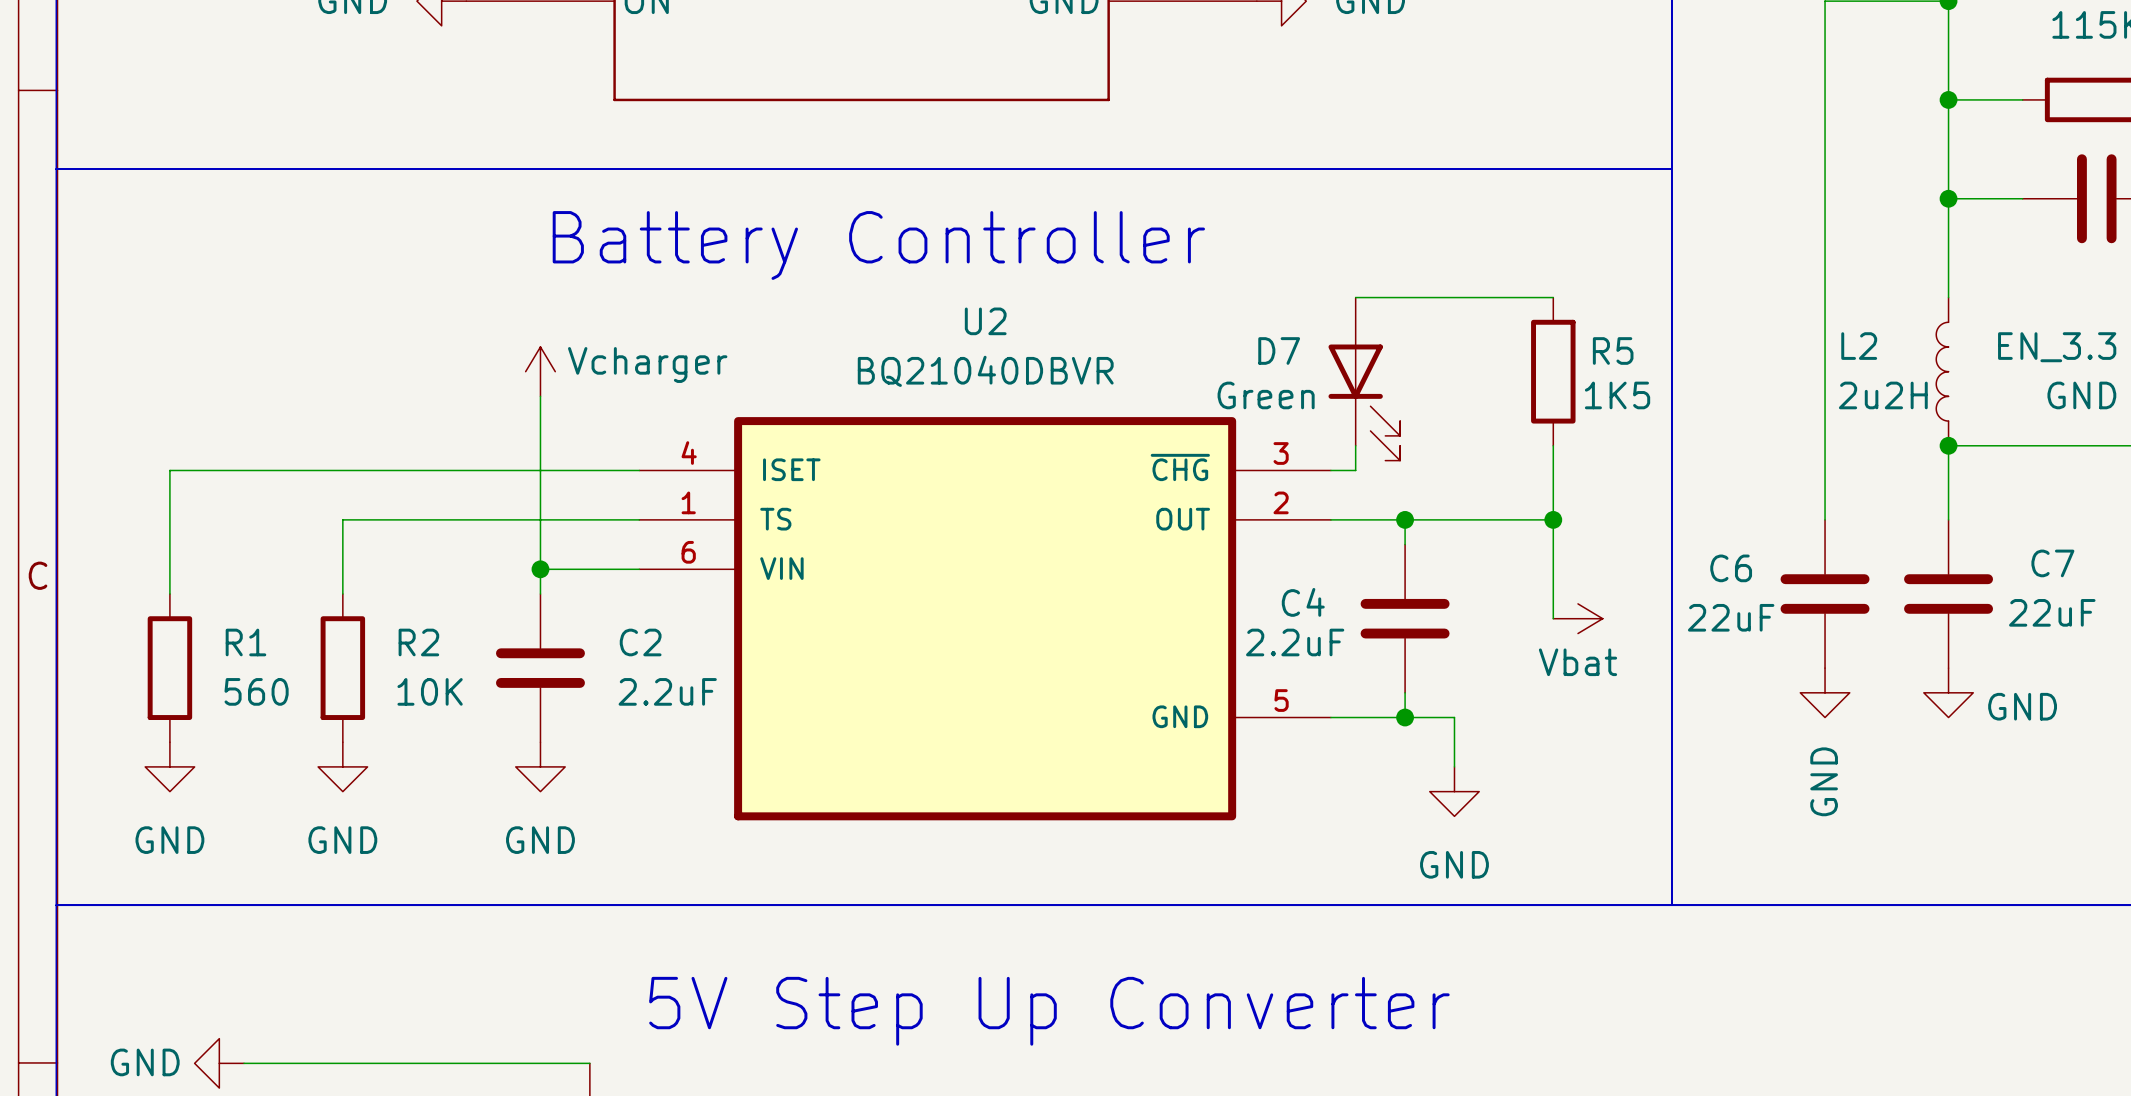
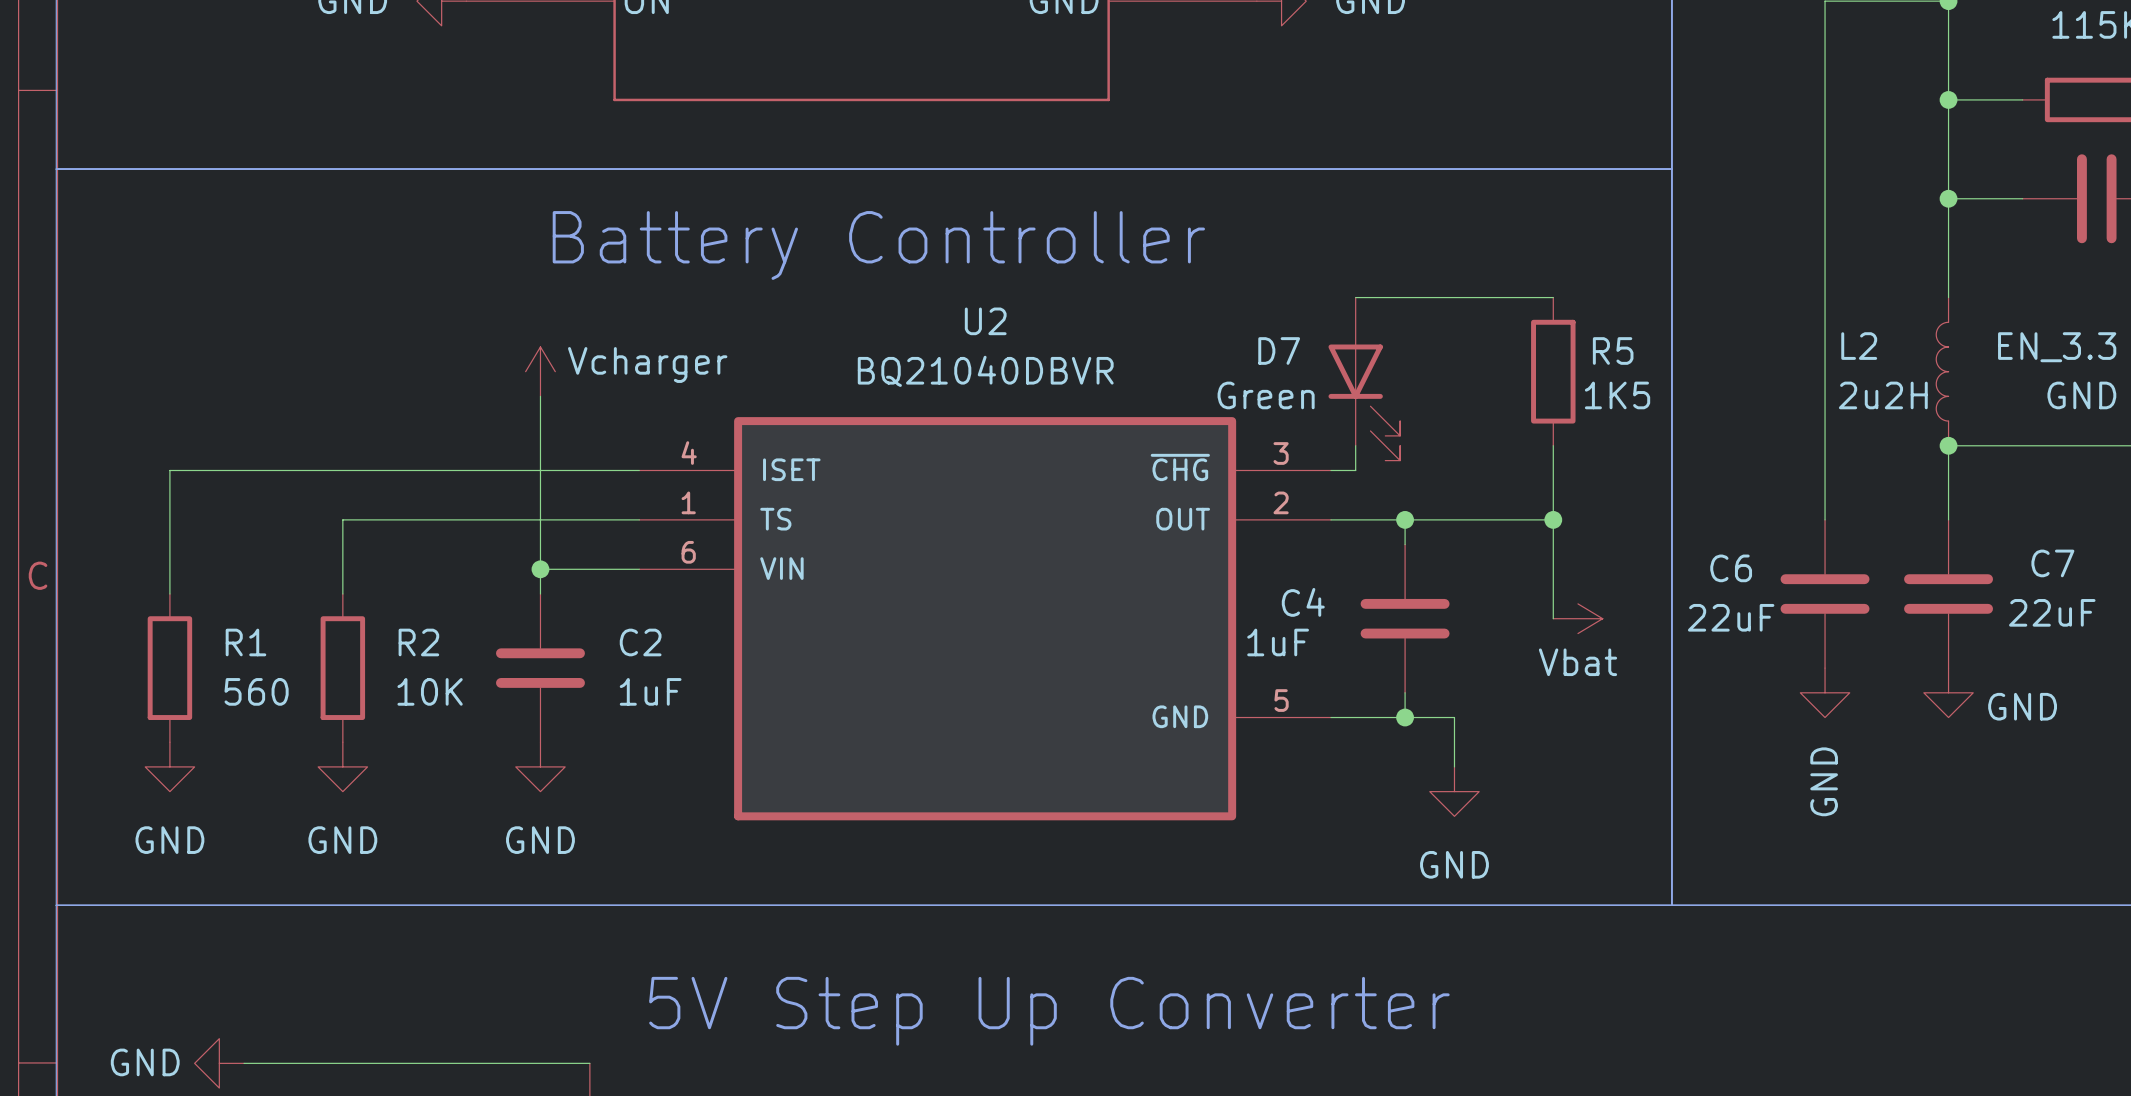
C4 value: 2.2uF (1295, 642) -> 1uF (1278, 642)
C2 value: 2.2uF (667, 691) -> 1uF (650, 691)

